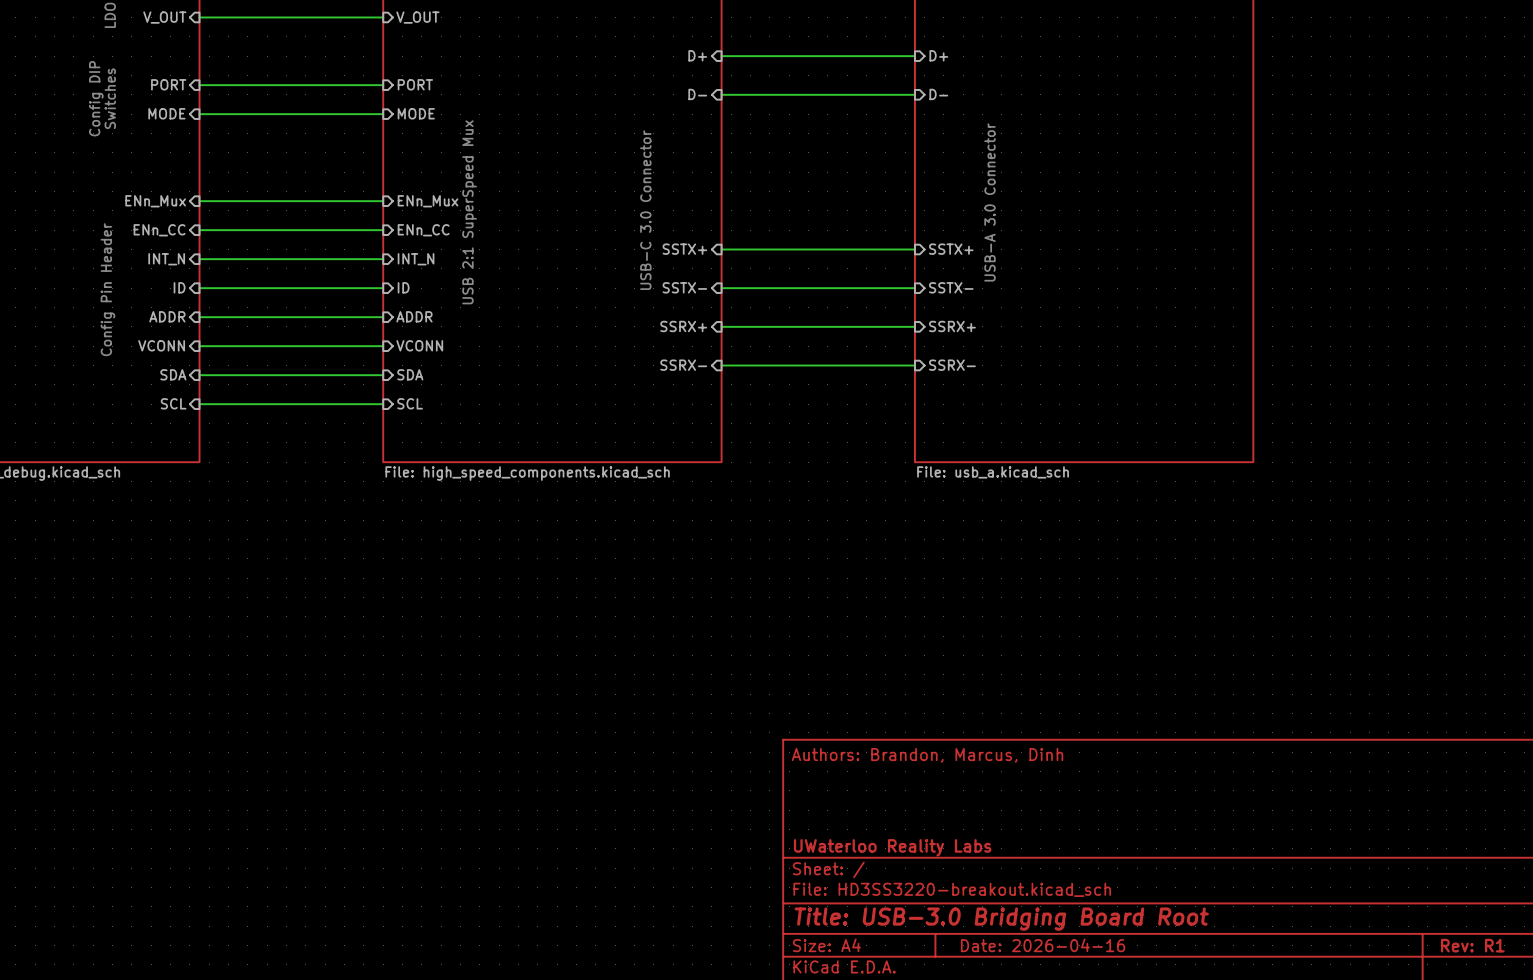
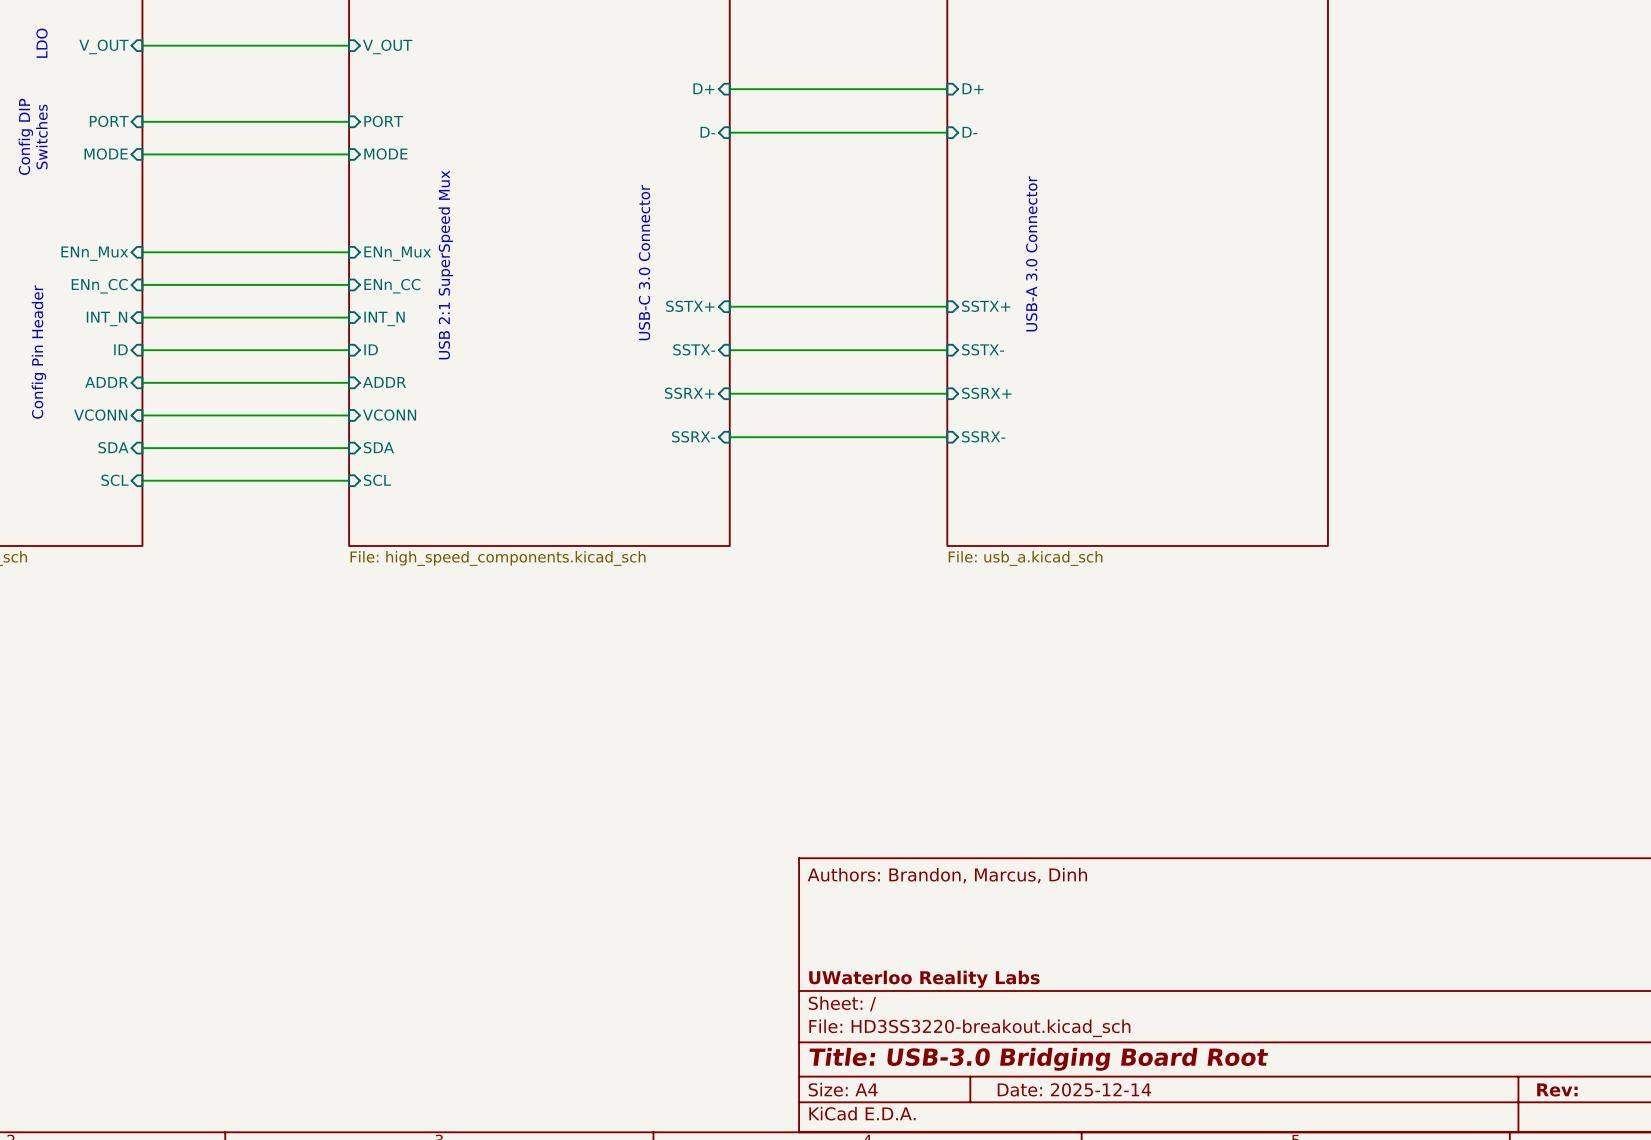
title block: Date: 2026-04-16 (1043, 945) -> Date: 2025-12-14 (1074, 1089)
title block: Rev: R1 (1472, 945) -> Rev: (1557, 1089)

